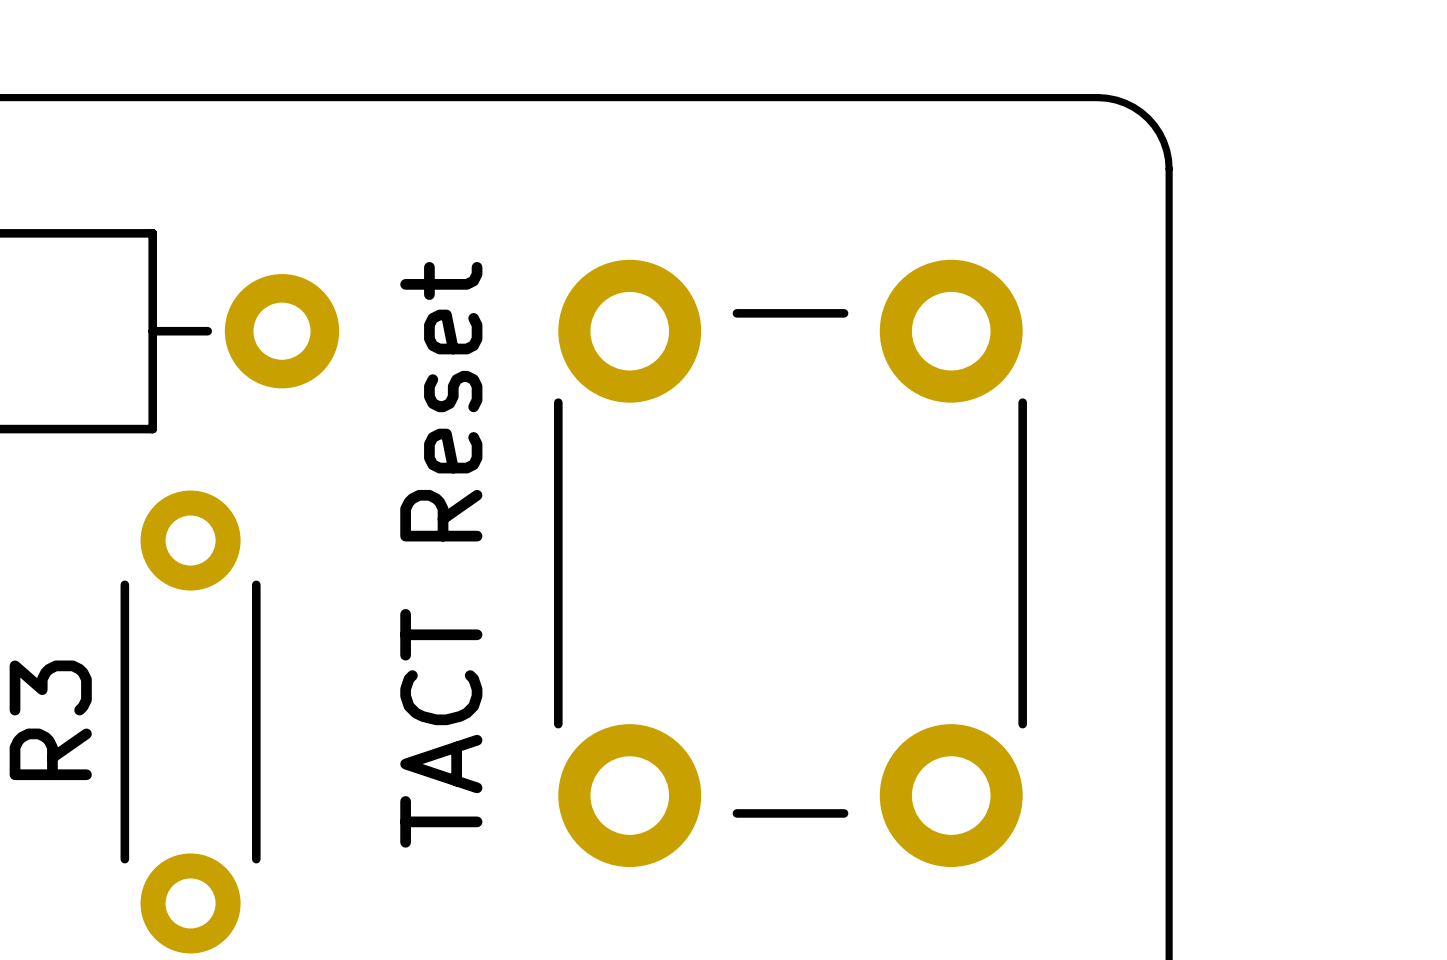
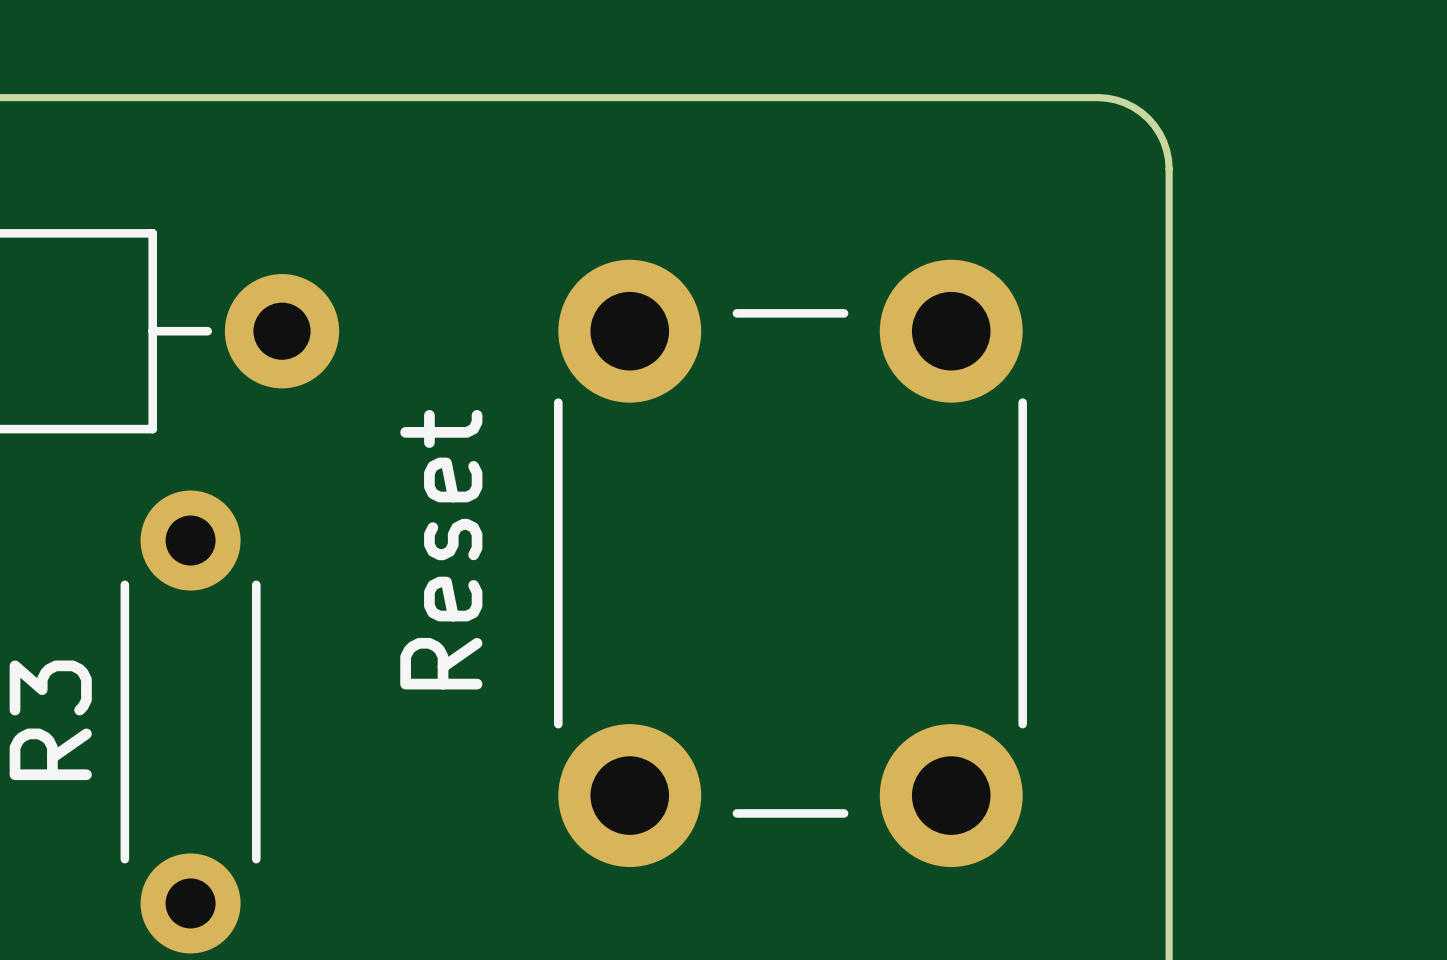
part value: TACT Reset (441, 554) -> Reset (441, 549)

